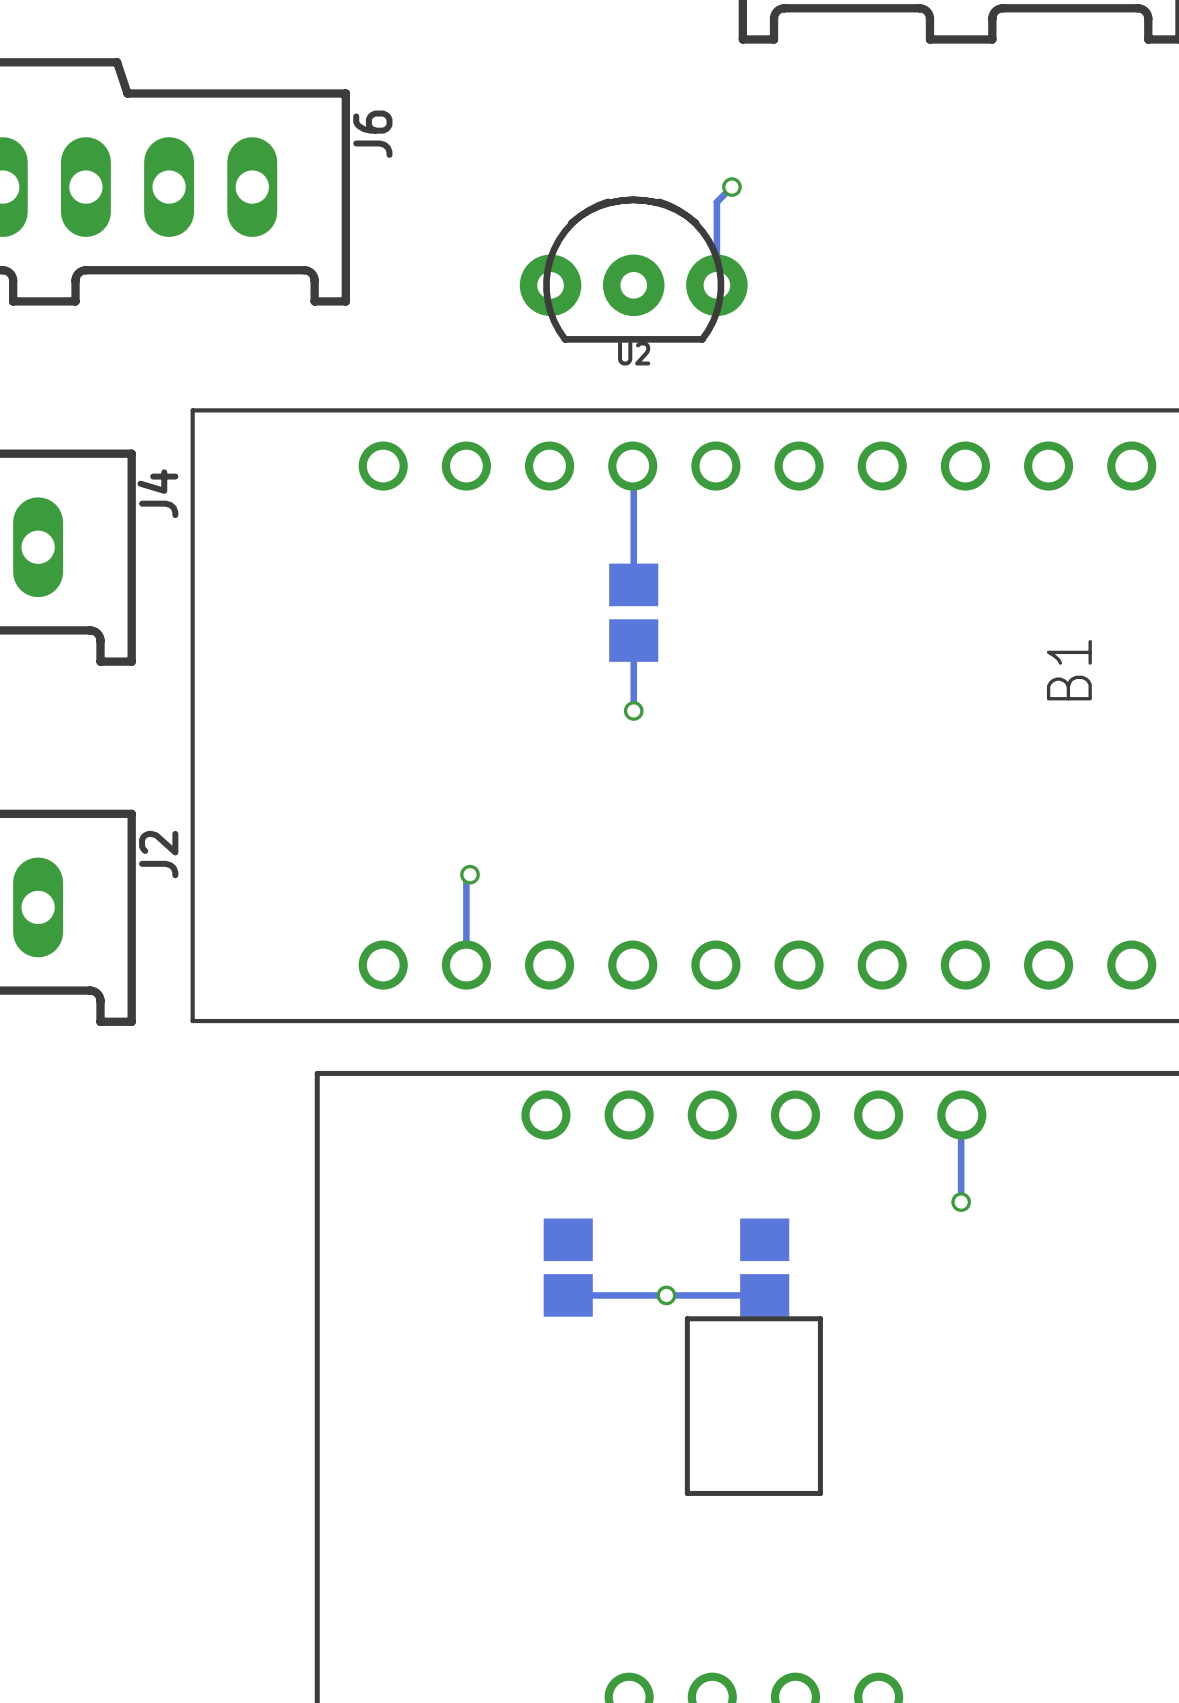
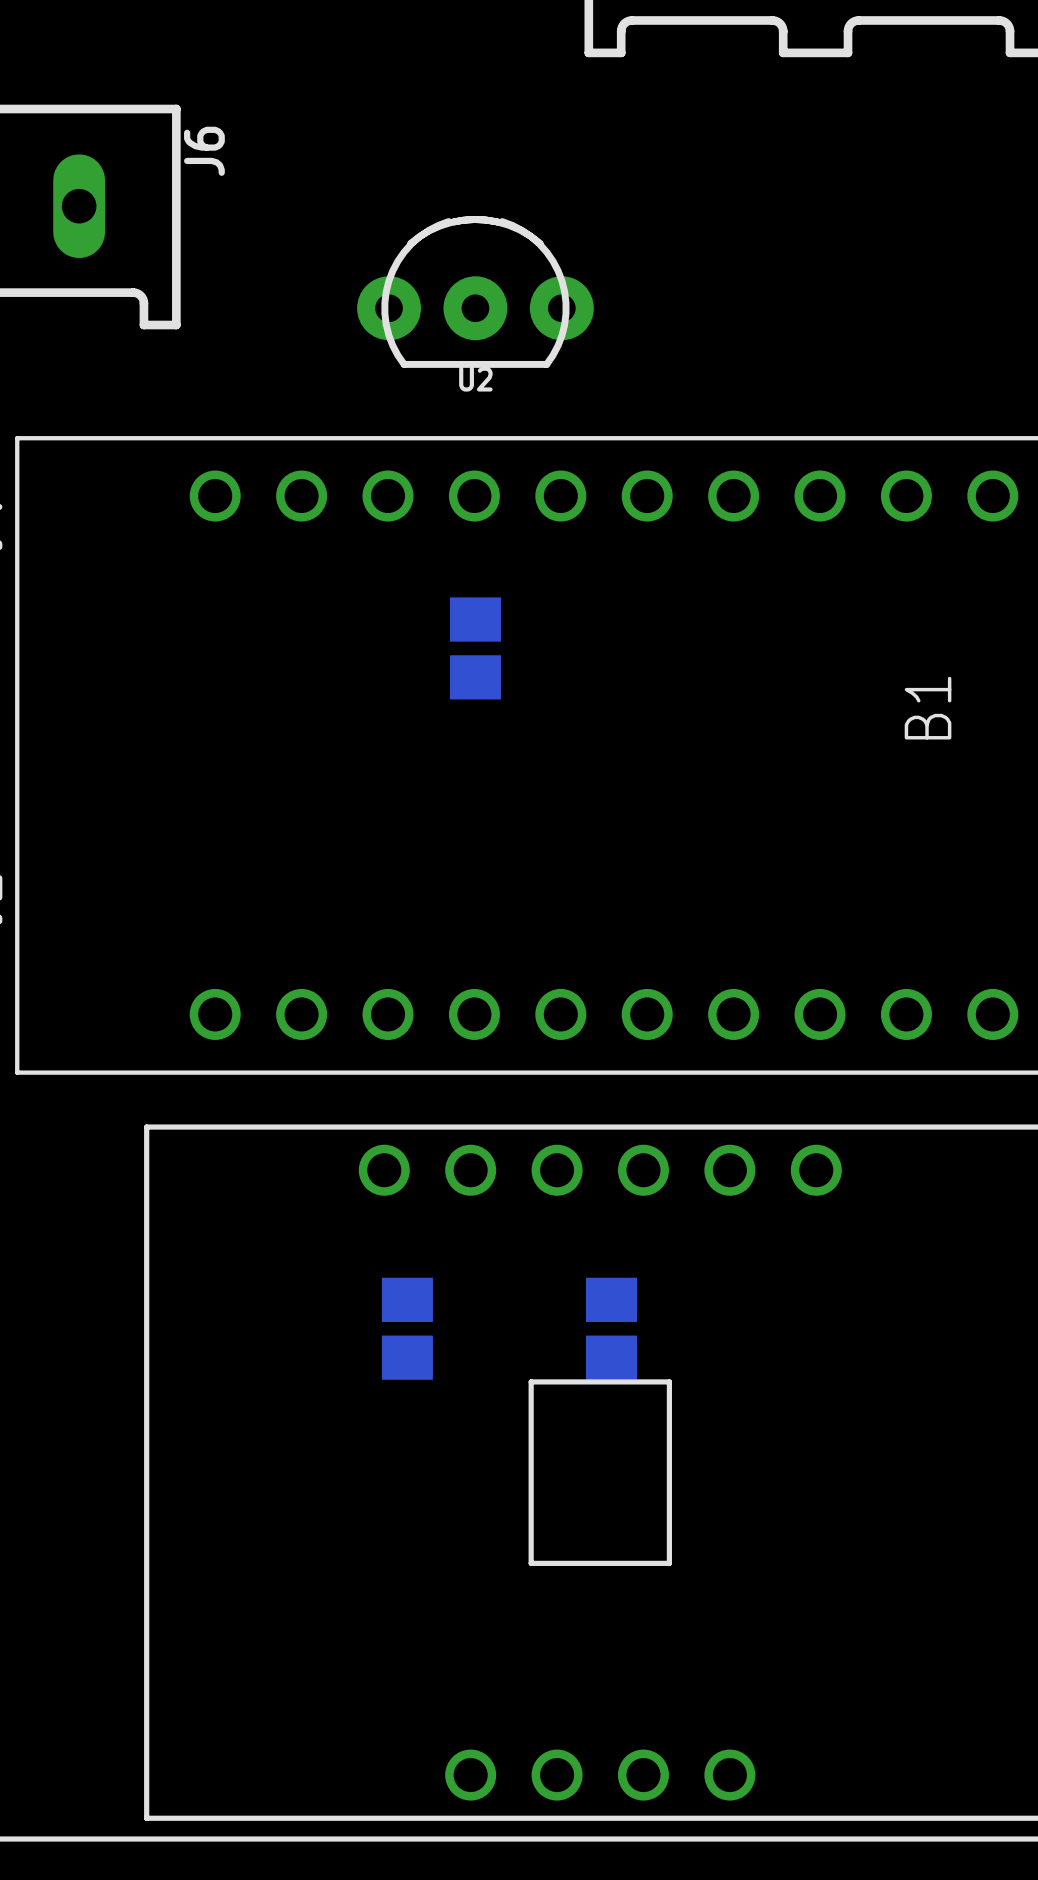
bottom track: (731, 187) (716, 202) (716, 285) -> none
via: (731, 187) -> none
bottom track: (632, 466) (633, 584) -> none
bottom track: (633, 640) (633, 710) -> none
via: (633, 710) -> none
bottom track: (470, 874) (466, 878) (466, 965) -> none
via: (470, 874) -> none
bottom track: (961, 1115) (961, 1202) -> none
via: (961, 1202) -> none
bottom track: (568, 1295) (764, 1295) -> none
via: (666, 1295) -> none

